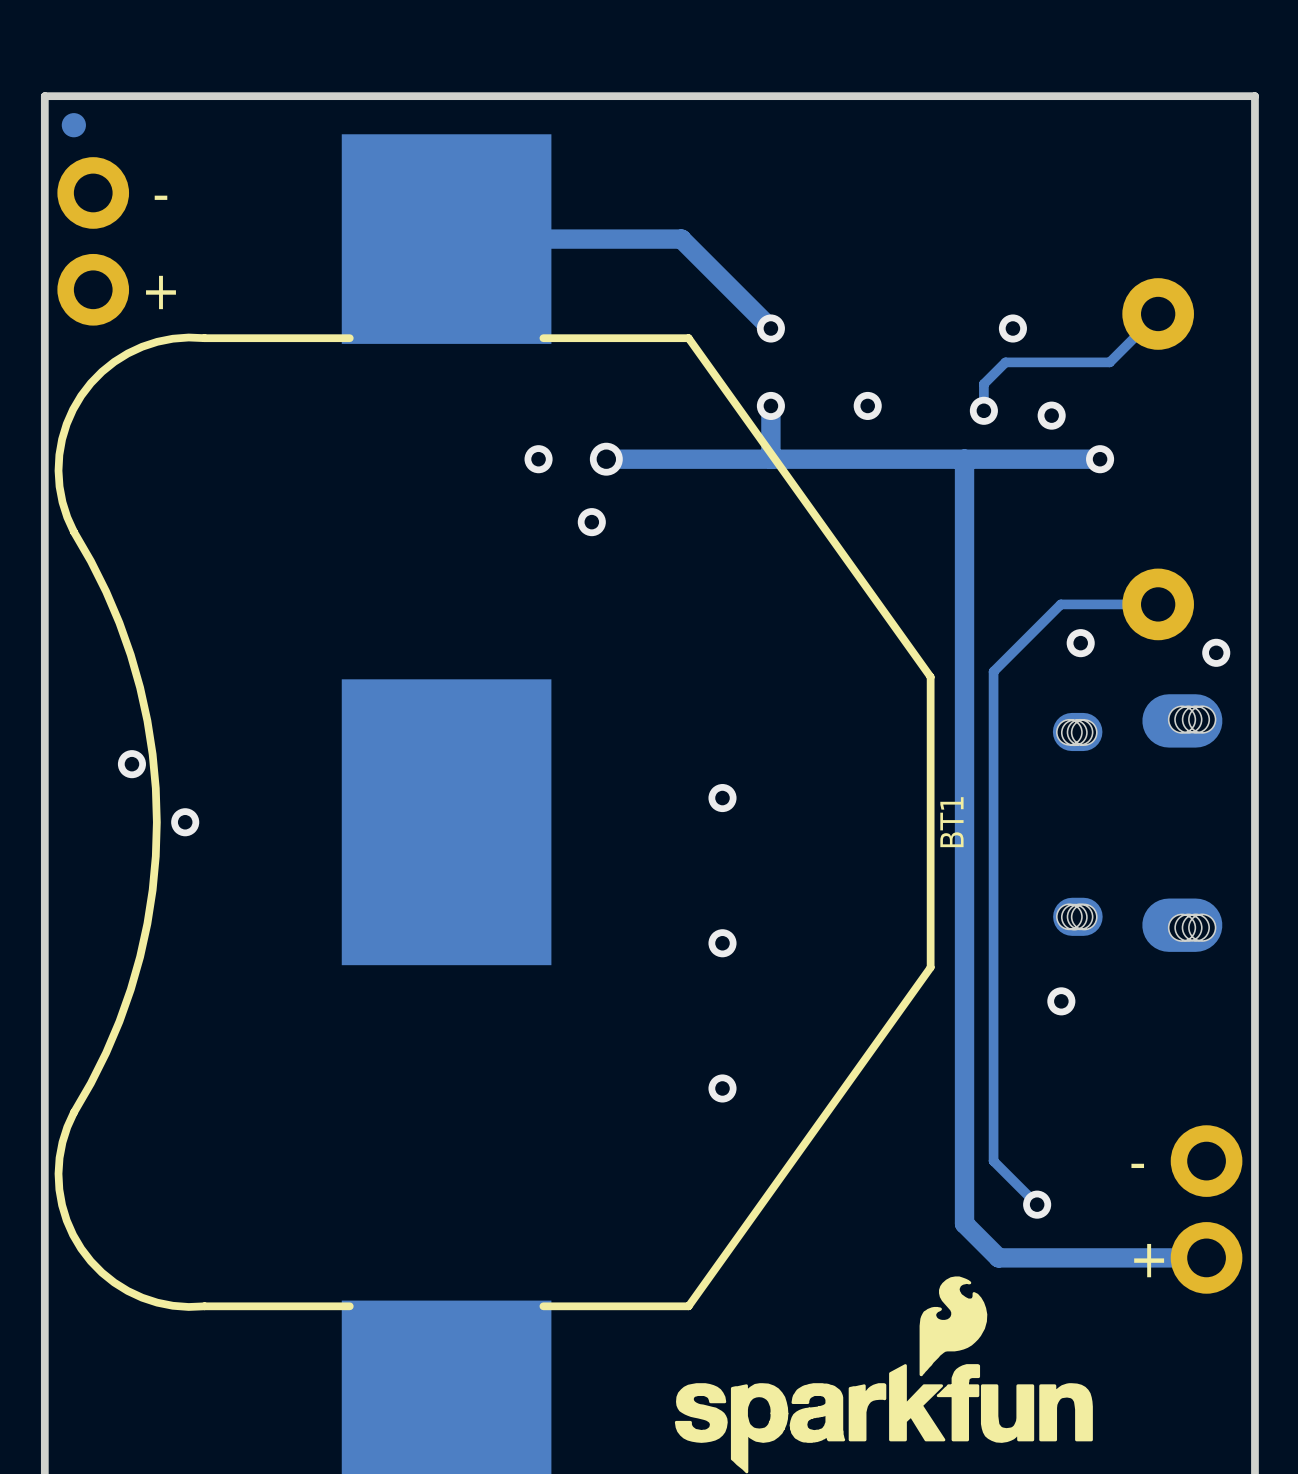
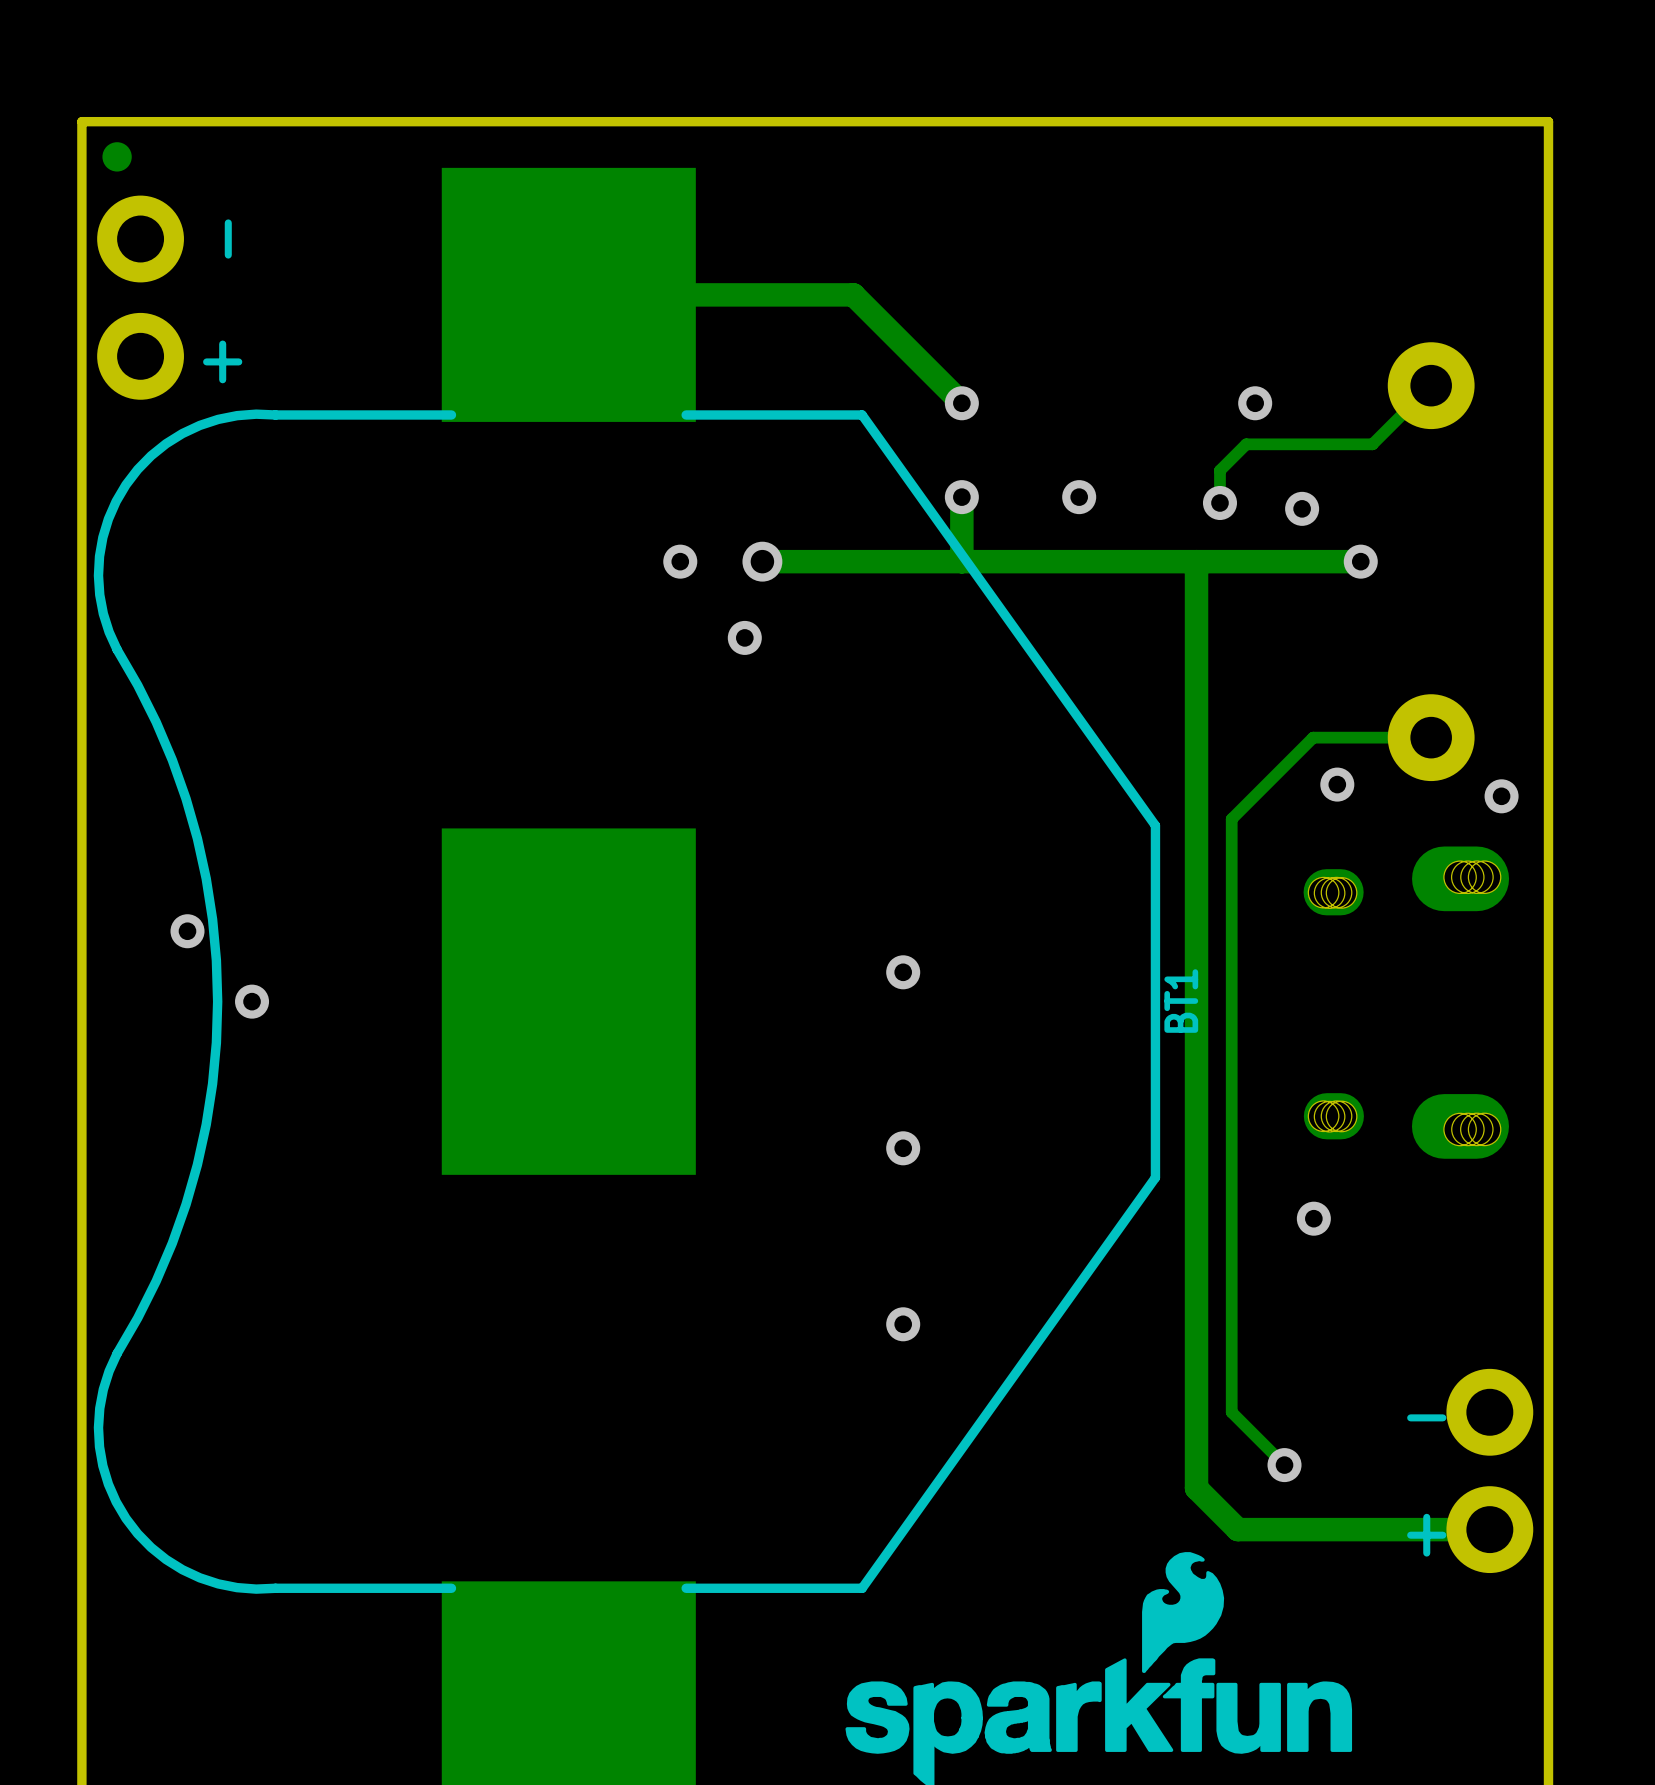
text rotation: 0° (160, 197) -> 90° counterclockwise (228, 239)

